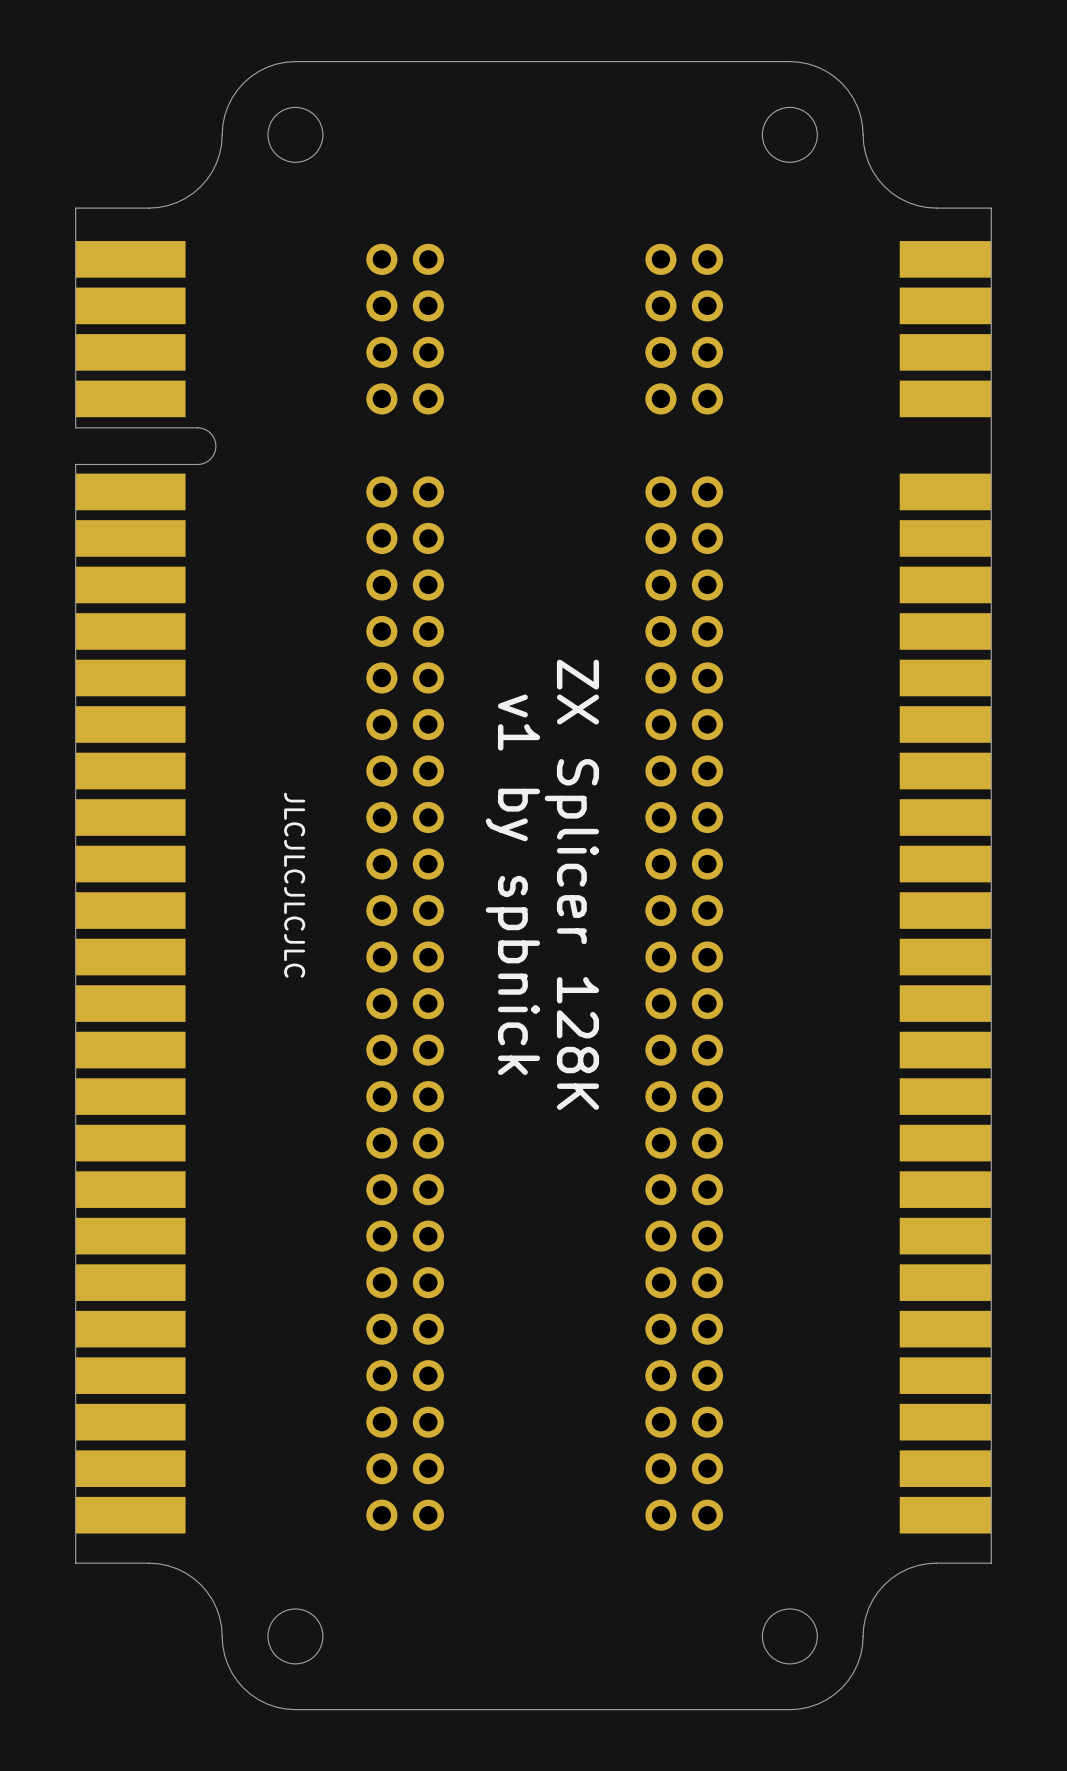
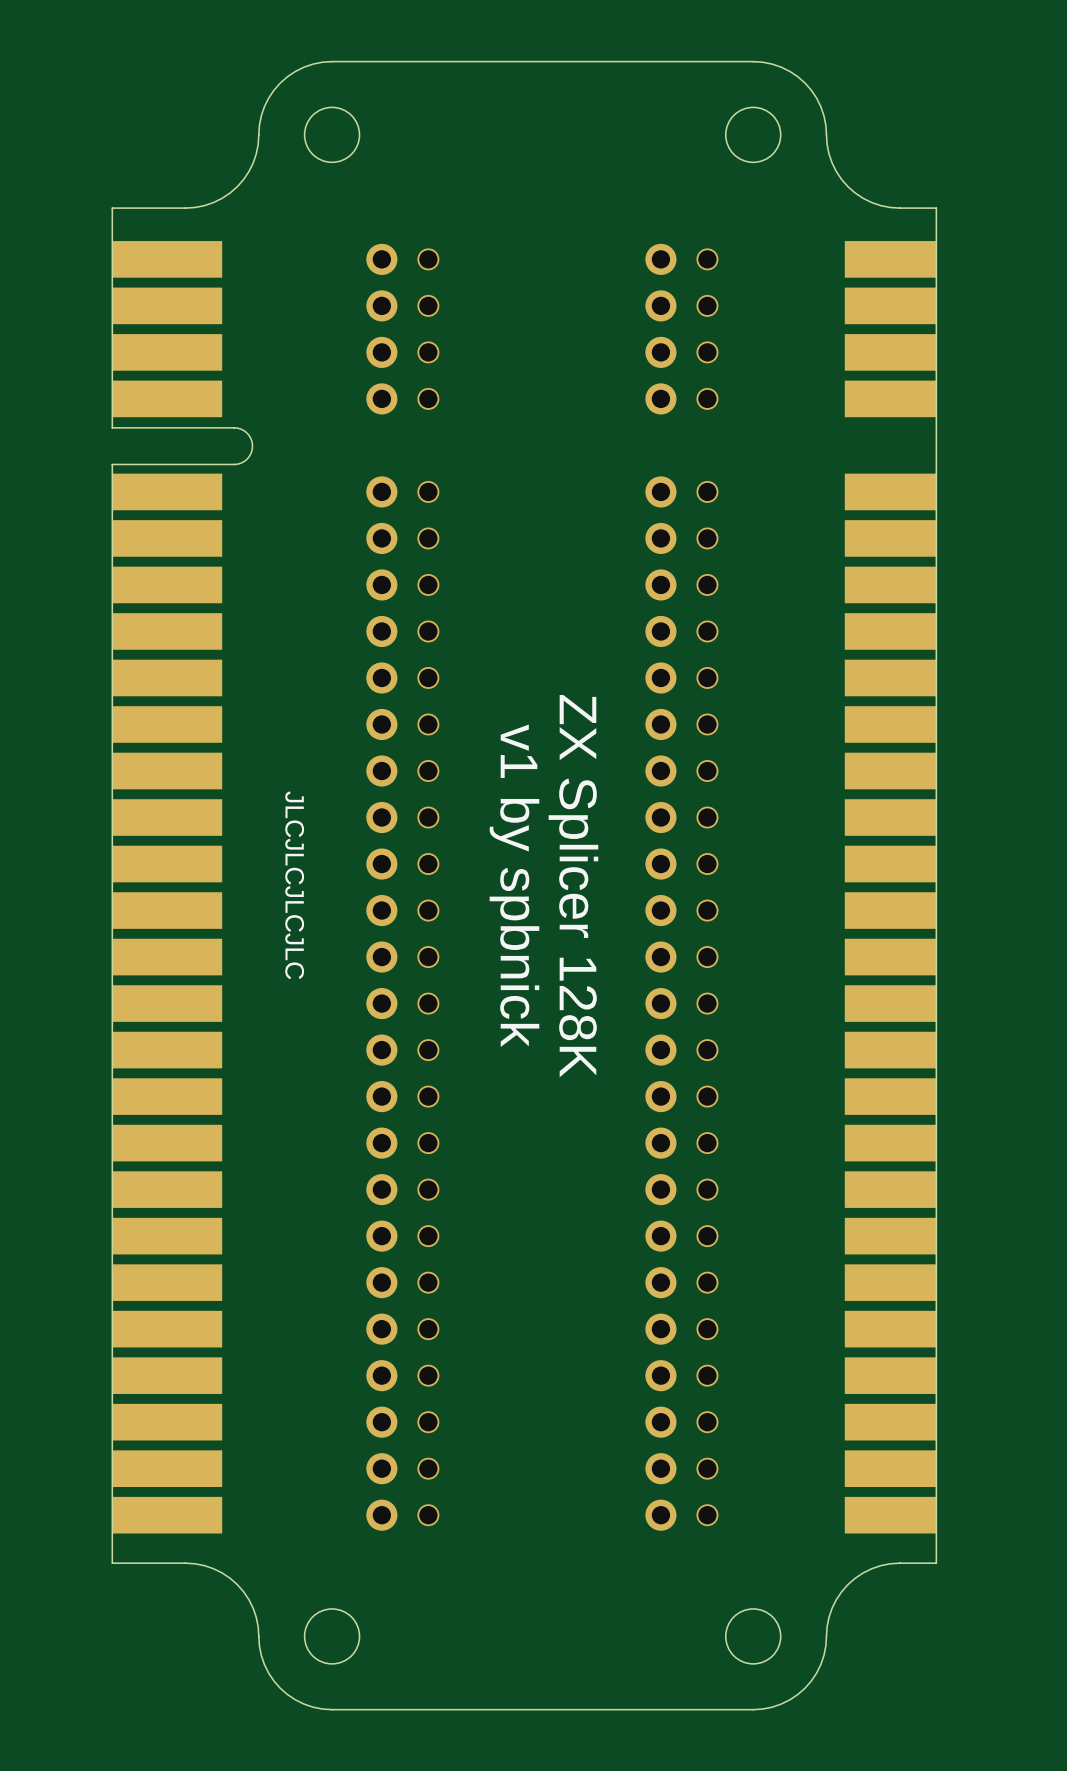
board edge: (332, 61) (285, 62) (267, 67) (250, 76) (237, 90) (227, 106) (222, 125) (219, 153) (207, 179) (185, 198) (167, 205) (148, 208) -> (332, 61) (313, 64) (295, 71) (273, 90) (261, 115) (258, 144) (253, 162) (243, 179) (230, 192) (213, 202) (195, 207) (148, 208)
board edge: (753, 61) (789, 61) (808, 64) (826, 71) (841, 83) (857, 106) (862, 125) (865, 153) (872, 171) (884, 186) (899, 198) (926, 207) (991, 208) (991, 1563) (926, 1563) (899, 1572) (884, 1584) (872, 1599) (865, 1617) (862, 1645) (857, 1664) (841, 1688) (826, 1699) (808, 1707) (789, 1709) (753, 1709) -> (753, 61) (772, 64) (789, 71) (811, 90) (823, 115) (827, 144) (832, 162) (841, 179) (855, 192) (871, 202) (890, 207) (936, 208) (936, 1563) (890, 1563) (871, 1568) (855, 1578) (841, 1591) (832, 1608) (827, 1626) (823, 1655) (811, 1681) (789, 1699) (772, 1707) (753, 1709)
round board edge position: (295, 134) -> (332, 134)
round board edge position: (789, 134) -> (753, 134)
board edge: (112, 208) (75, 208) (75, 427) (112, 427) -> (112, 208) (112, 427)
part footprint: [366, 243, 444, 415] -> [366, 243, 440, 415]
part footprint: [645, 243, 724, 415] -> [645, 243, 719, 415]
part position: (130, 329) -> (167, 329)
part position: (945, 329) -> (890, 329)
board edge: (197, 427) (210, 433) (215, 446) (210, 459) (197, 464) -> (197, 427) (238, 428) (248, 435) (252, 446) (248, 457) (238, 463) (197, 464)
board edge: (112, 464) (75, 464) (75, 1563) (112, 1563) -> (112, 464) (112, 1563)
part footprint: [366, 476, 444, 1531] -> [366, 476, 440, 1531]
part footprint: [645, 476, 724, 1531] -> [645, 476, 719, 1531]
part position: (130, 1003) -> (167, 1003)
part position: (945, 1003) -> (890, 1003)
board edge: (148, 1563) (176, 1568) (193, 1578) (207, 1591) (219, 1617) (222, 1645) (227, 1664) (237, 1681) (250, 1694) (267, 1704) (285, 1709) (332, 1709) -> (148, 1563) (195, 1563) (213, 1568) (230, 1578) (243, 1591) (253, 1608) (258, 1626) (261, 1655) (273, 1681) (295, 1699) (313, 1707) (332, 1709)
round board edge position: (295, 1636) -> (332, 1636)
round board edge position: (789, 1636) -> (753, 1636)

